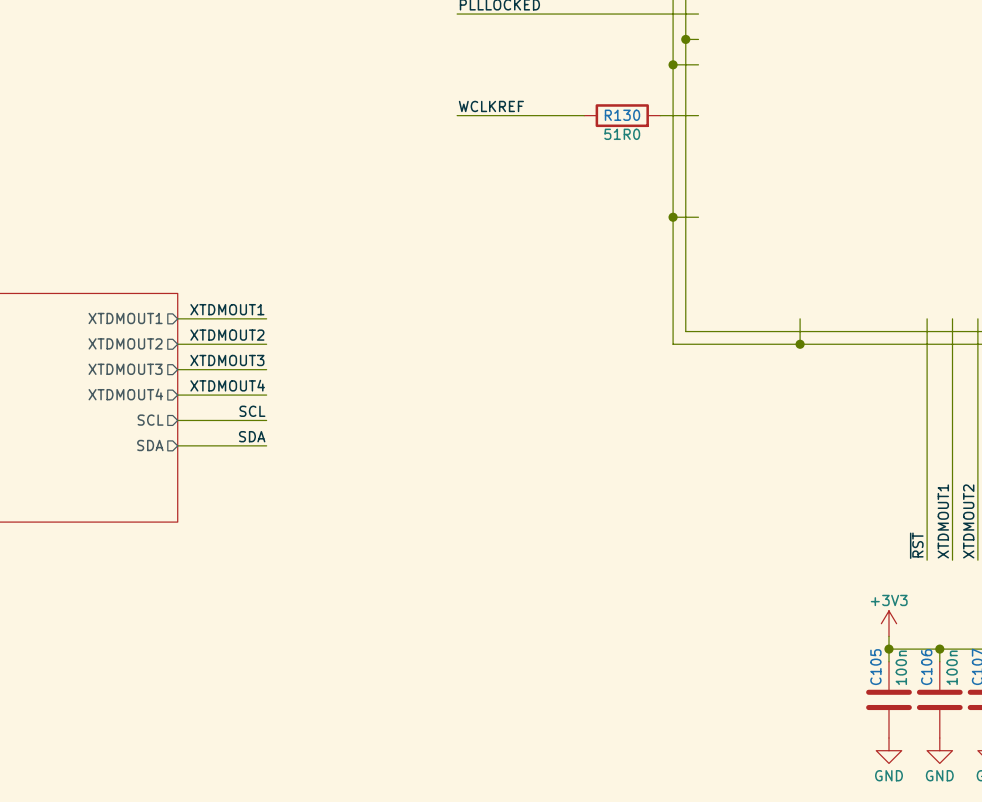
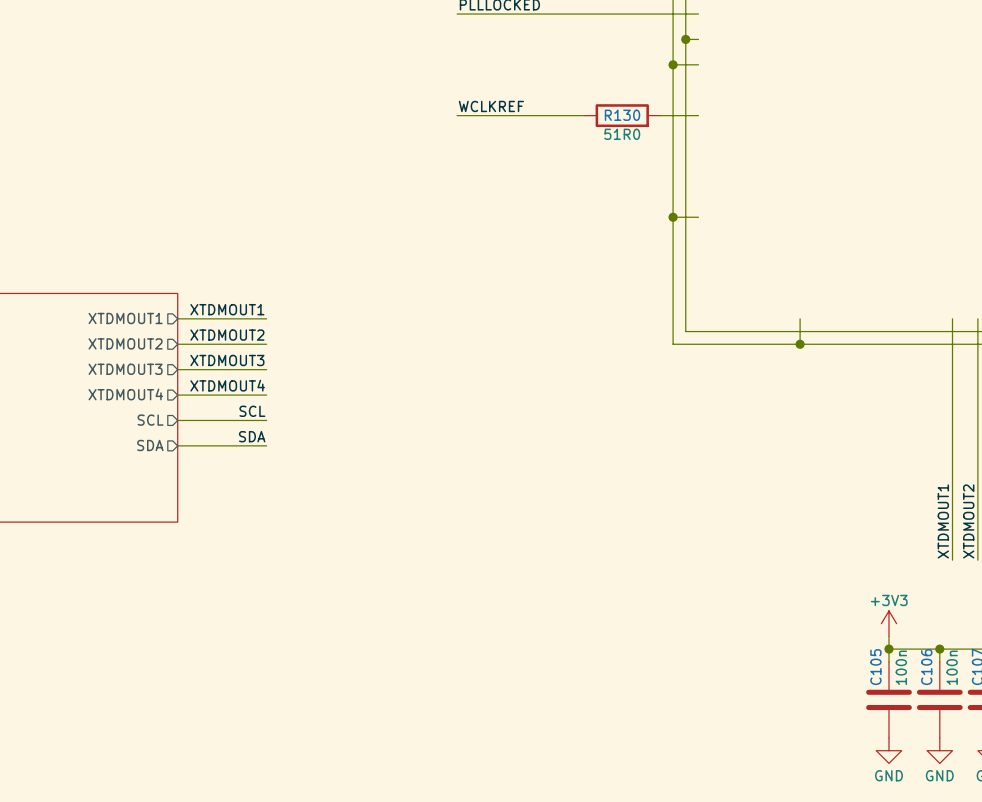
wire: (927, 318) (927, 560) -> none
label: ~{RST} (916, 545) -> none

